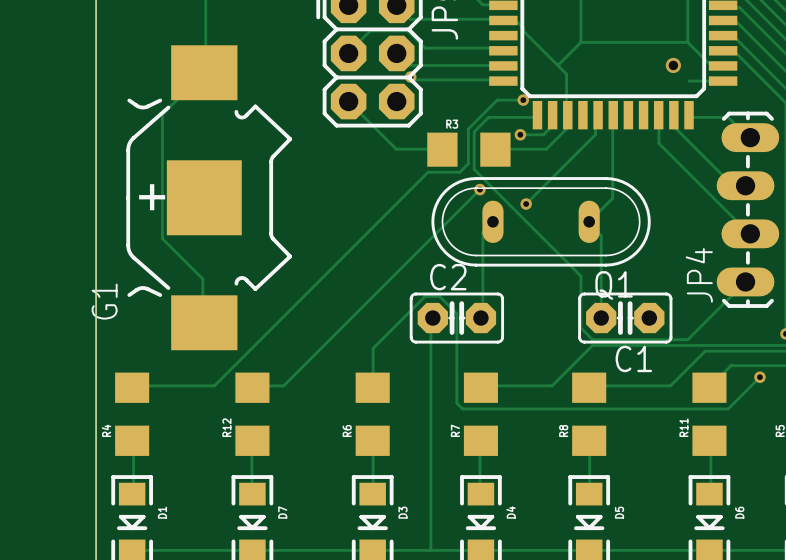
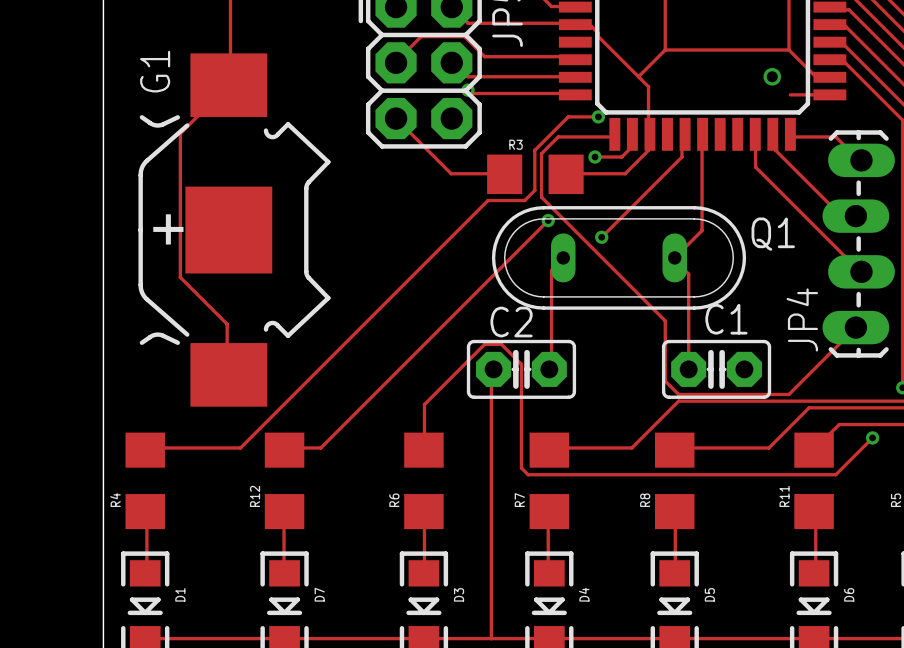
Q1 name position: Q1 (614, 285) -> Q1 (773, 234)
G1 name position: G1 (104, 301) -> G1 (155, 71)
C1 name position: C1 (633, 358) -> C1 (726, 319)

